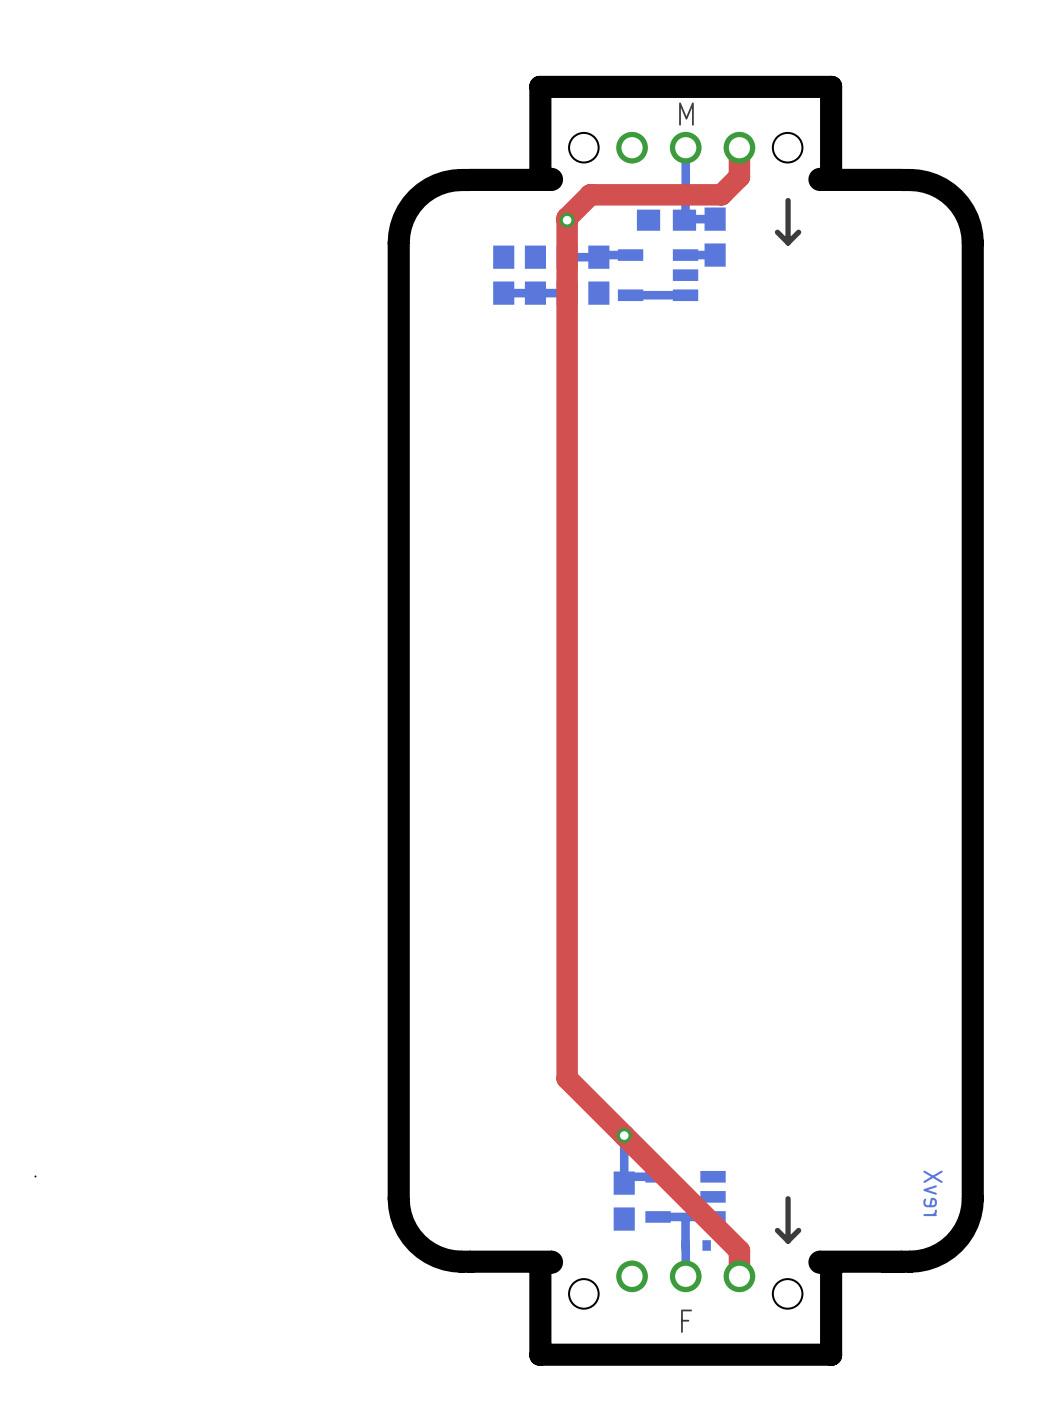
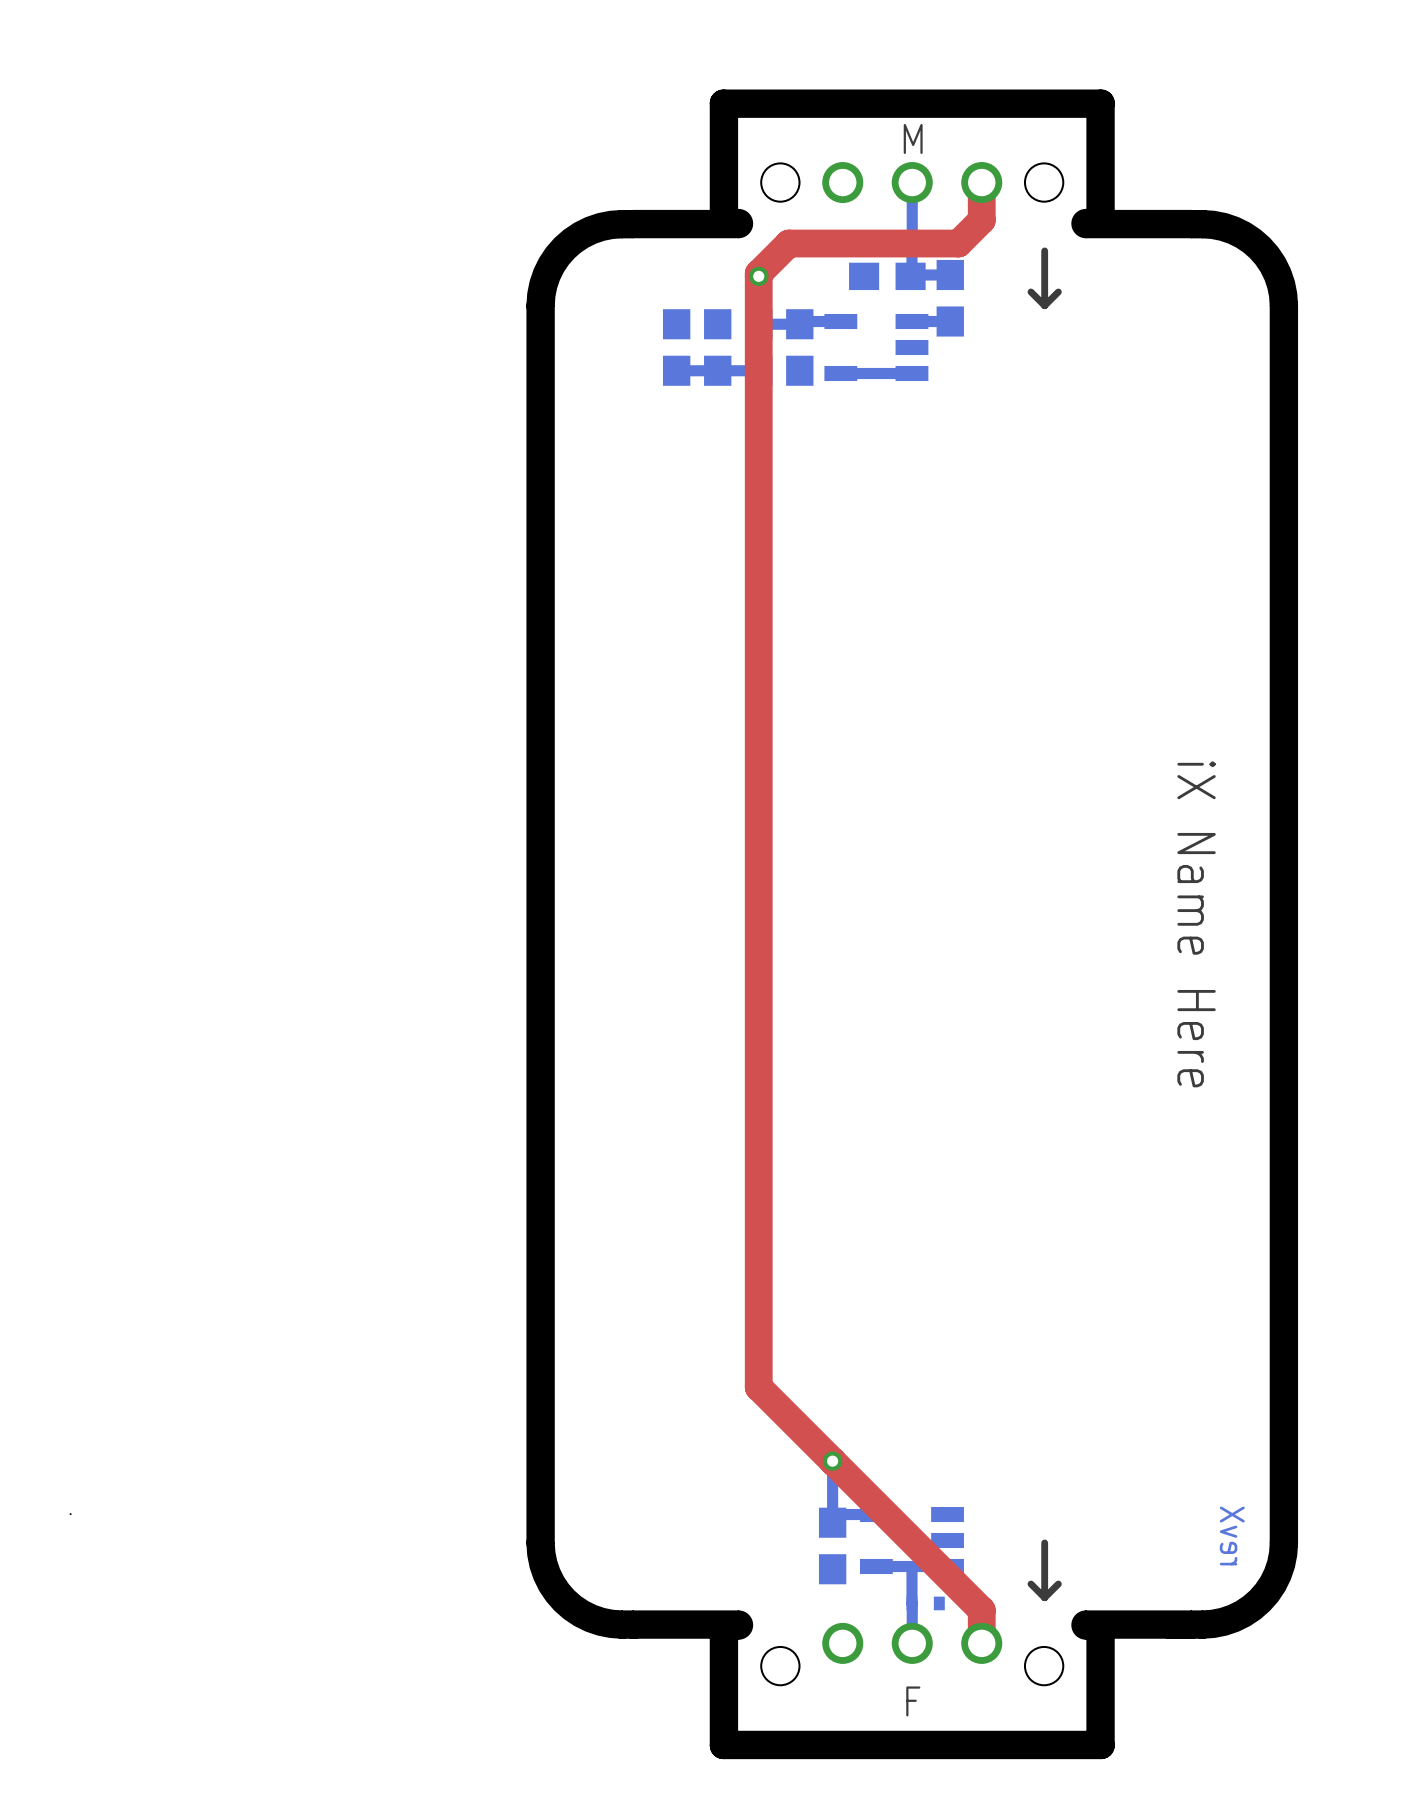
text: none -> iX Name Here (1196, 924)

